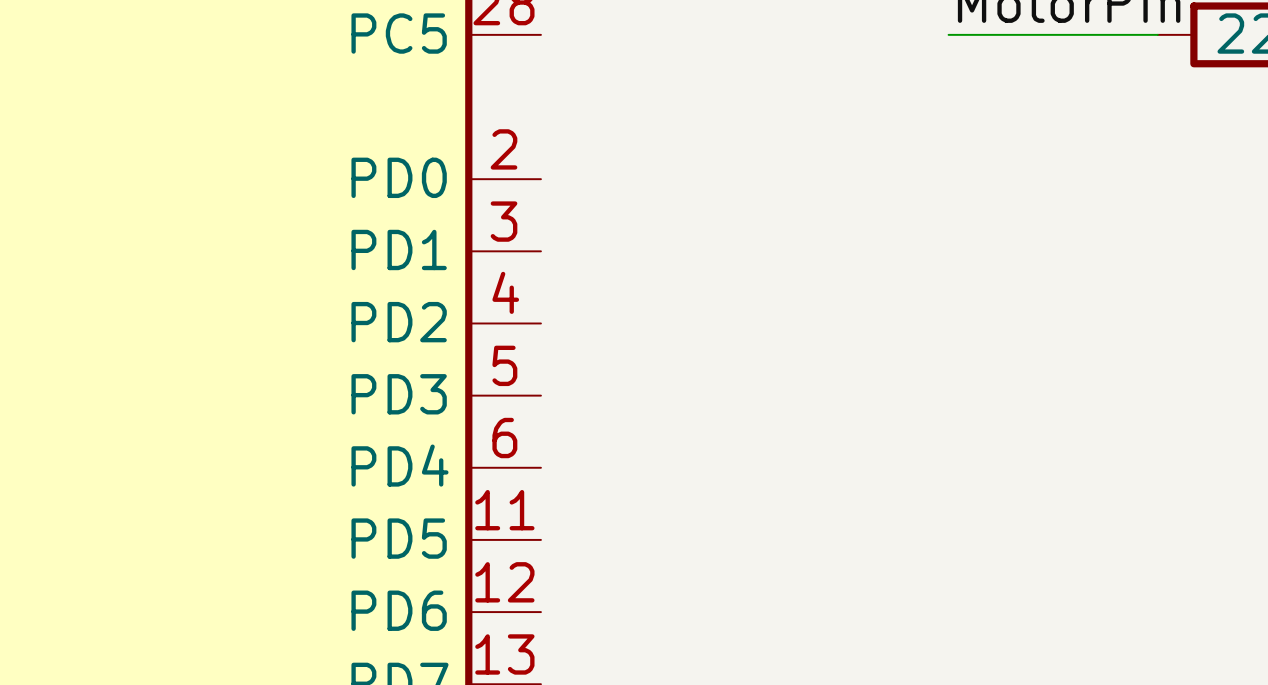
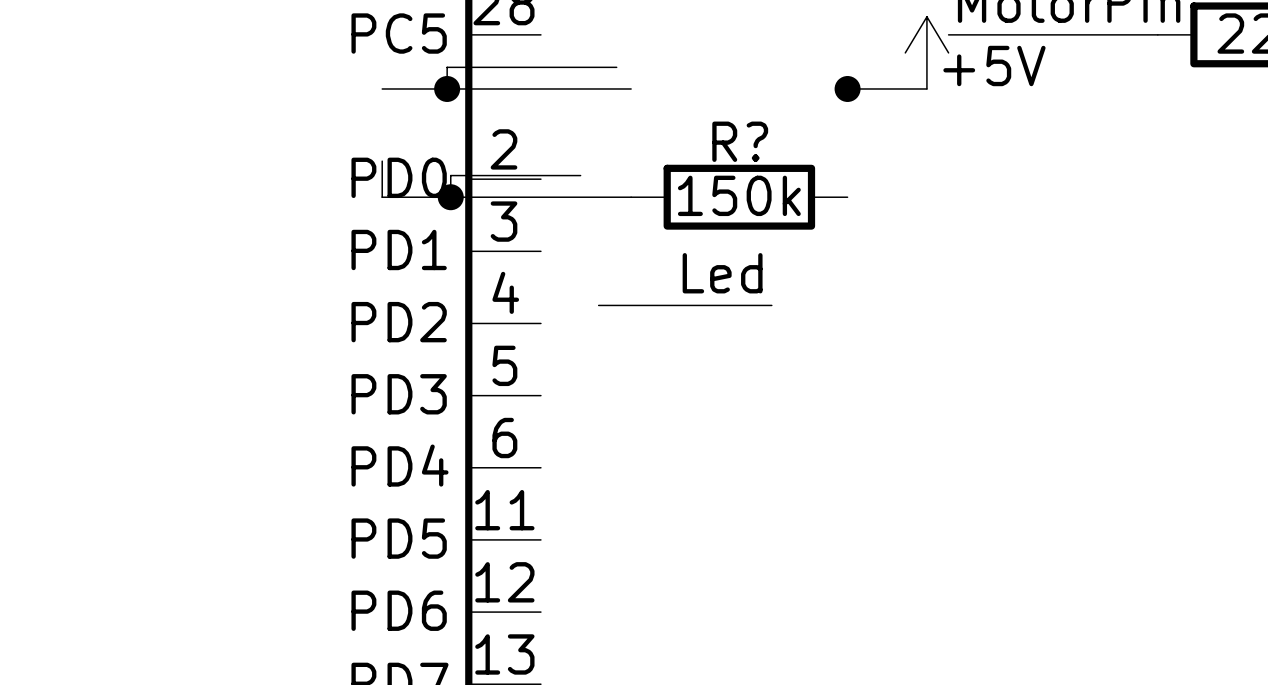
power symbol: none -> +5V (926, 52)
wire: none -> (616, 67) (447, 67) (447, 88)
wire: none -> (382, 88) (631, 88)
junction: none -> (447, 88)
wire: none -> (847, 88) (926, 88)
junction: none -> (847, 88)
wire: none -> (382, 161) (382, 197) (631, 197)
wire: none -> (580, 175) (450, 175) (450, 197)
junction: none -> (450, 197)
R?: none -> 150k (739, 197)
label: none -> Led (722, 273)
wire: none -> (598, 305) (771, 305)

